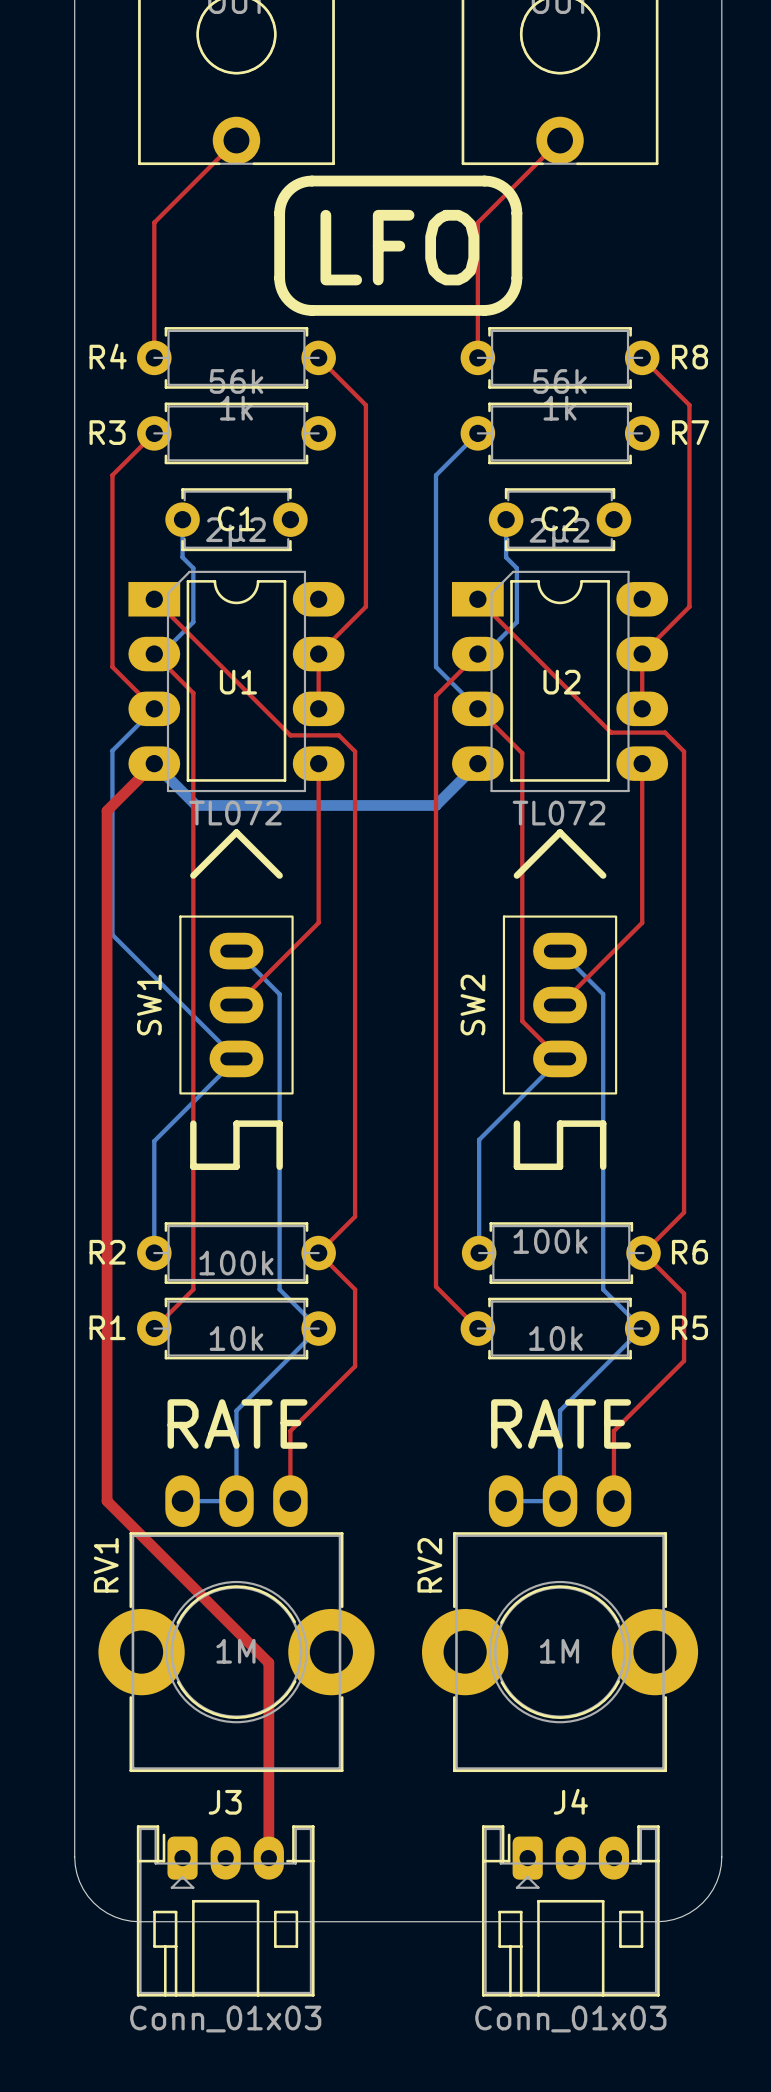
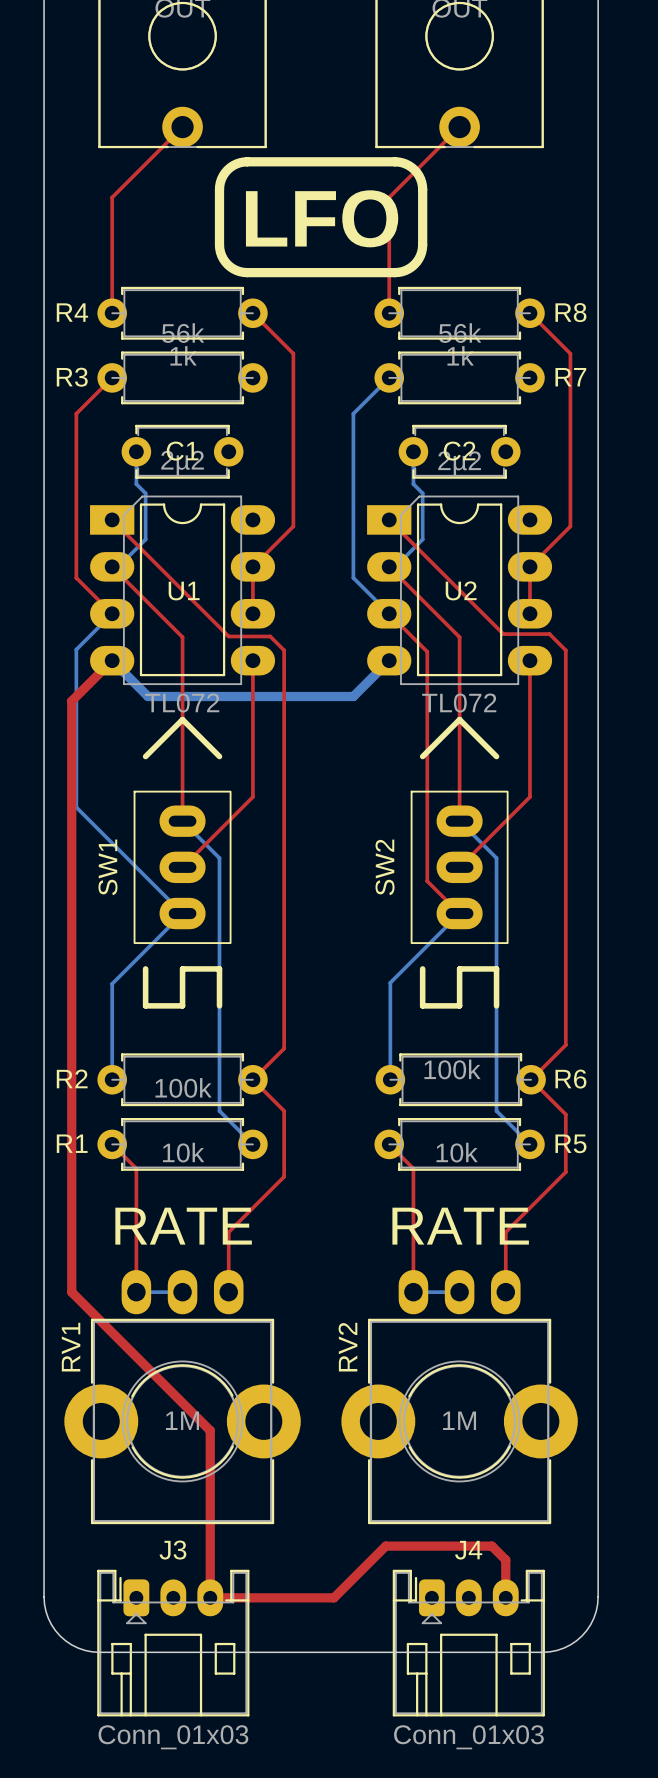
top track: (477, 654) (436, 695) (436, 1286) (477, 1328) -> (389, 566) (459, 637) (459, 821)
top track: (193, 693) (193, 1289) (154, 1328) -> (145, 600) (182, 637) (182, 821)
top track: none -> (112, 1144) (136, 1168) (136, 1292)
bottom track: (318, 1328) (236, 1410) (236, 1501) -> none
top track: none -> (389, 1144) (413, 1168) (413, 1292)
bottom track: (642, 1328) (560, 1410) (560, 1501) -> none
top track: none -> (210, 1597) (334, 1597) (385, 1546) (491, 1546) (505, 1559) (505, 1597)

